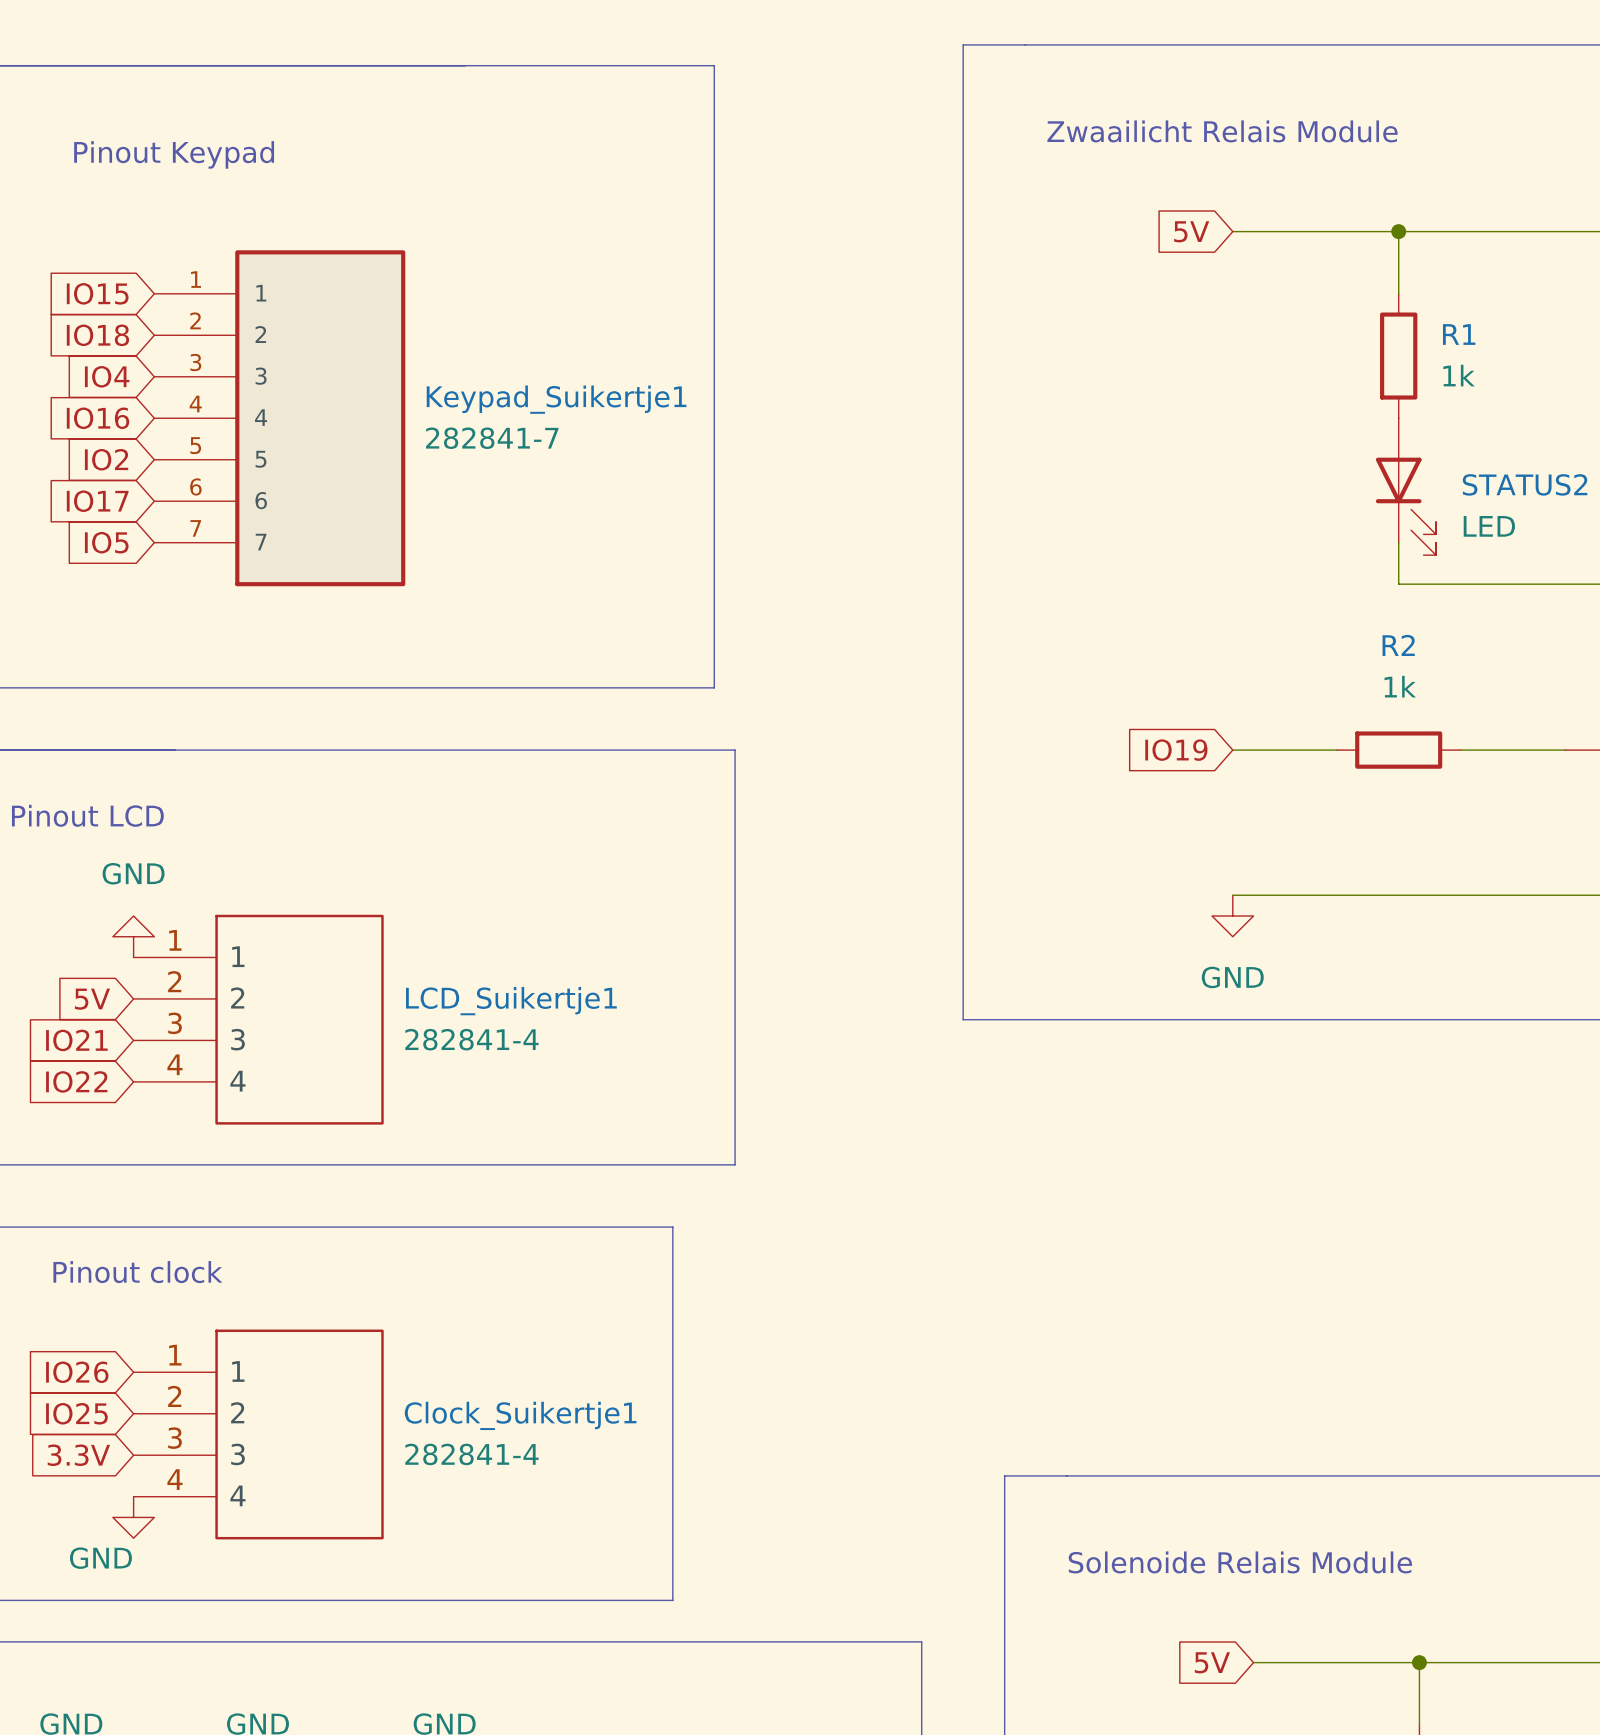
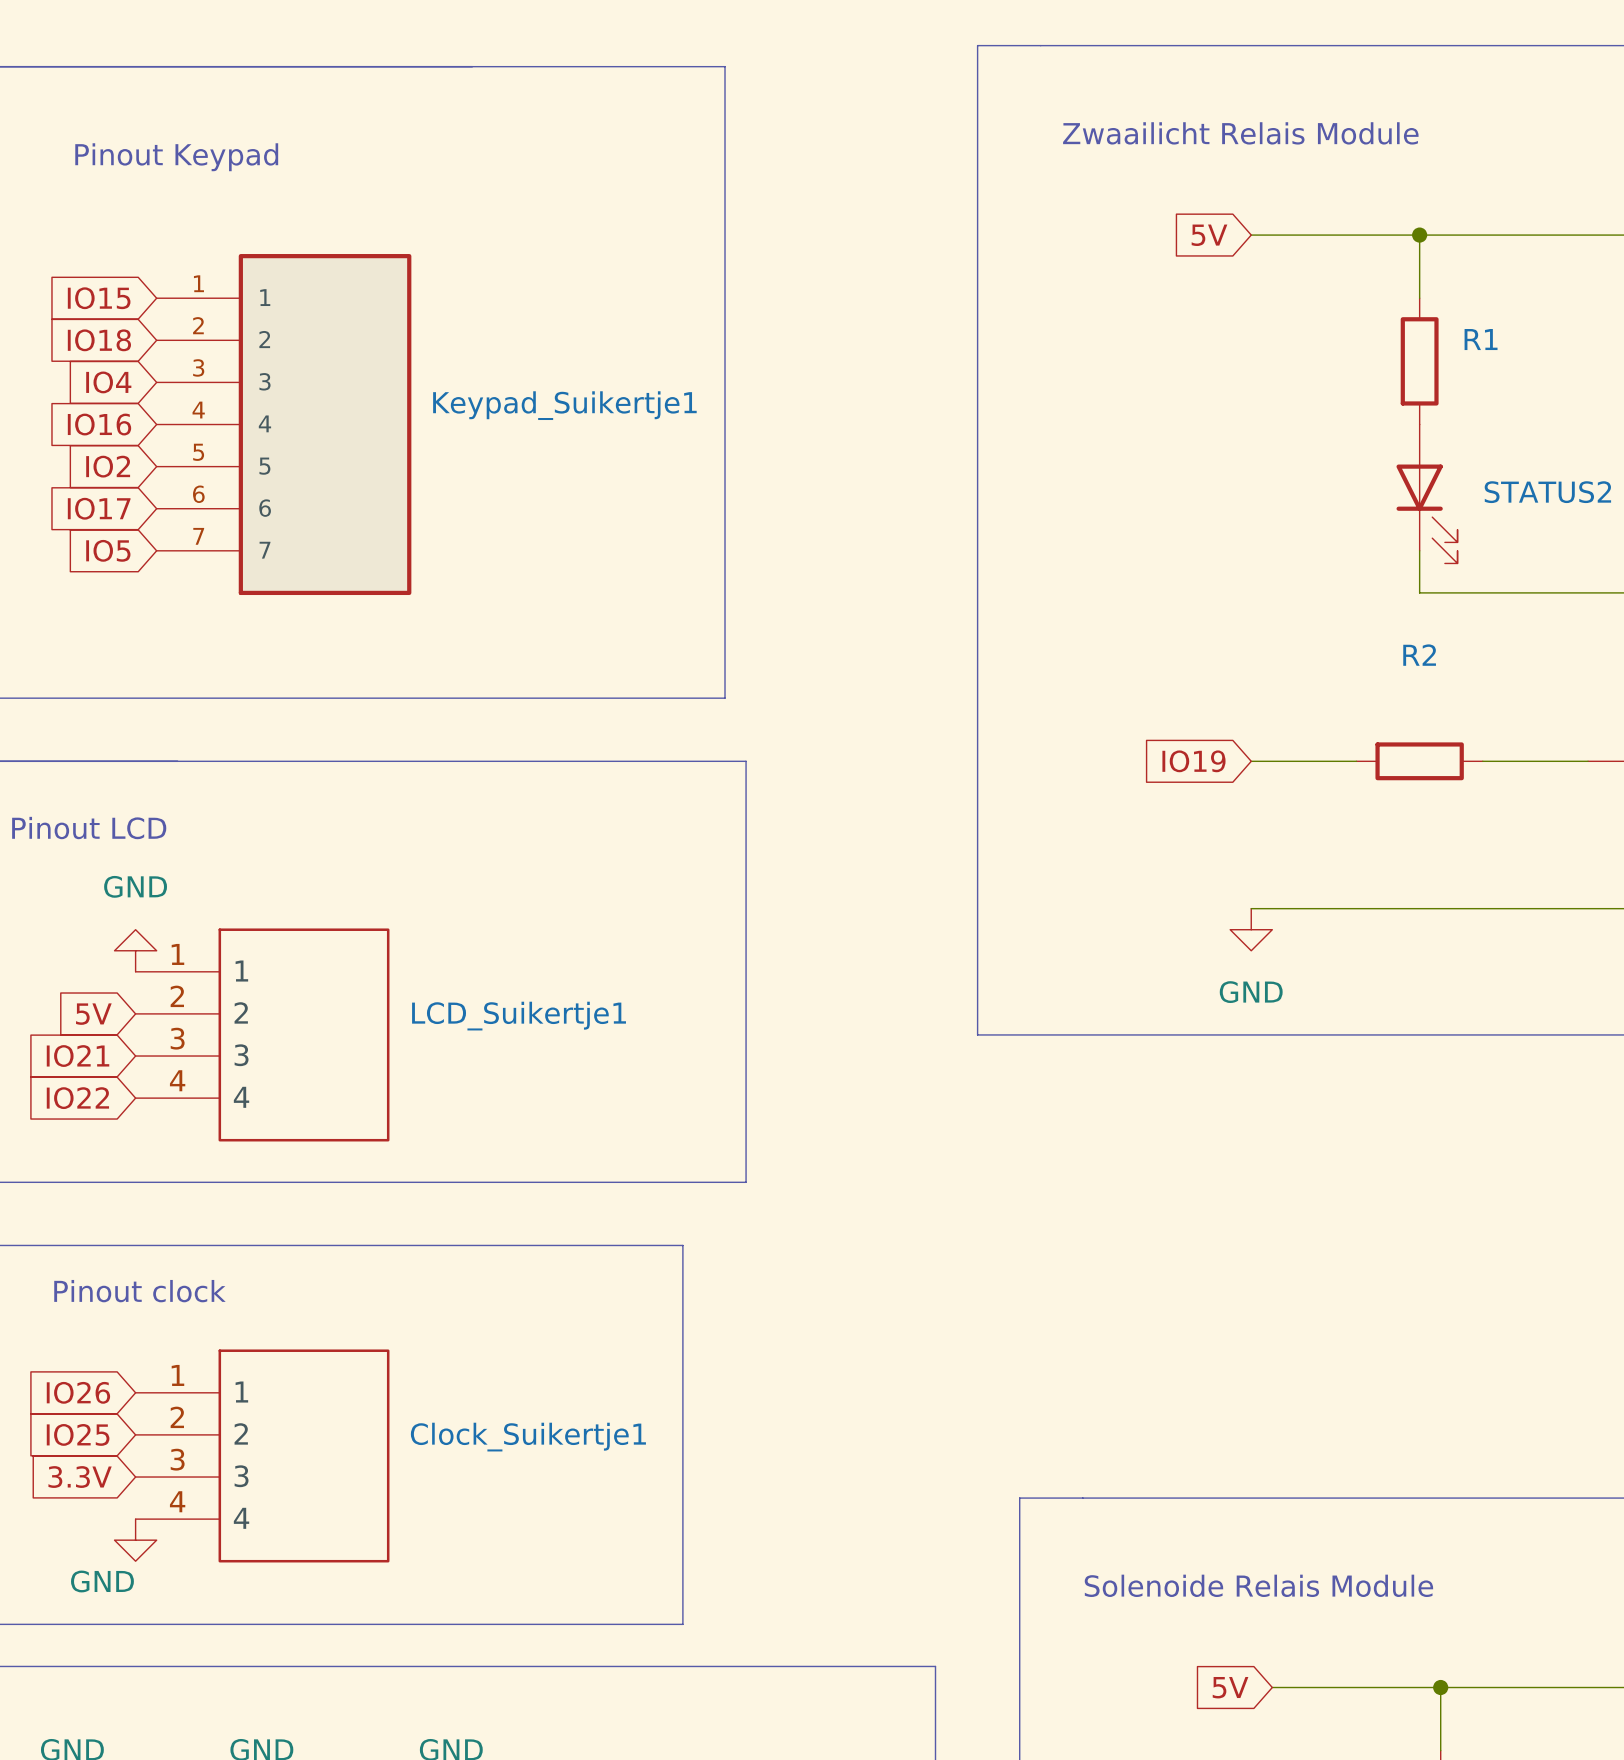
R1 value: 1k (1458, 375) -> none
Keypad_Suikertje1 value: 282841-7 (492, 438) -> none
STATUS2 value: LED (1489, 526) -> none
R2 value: 1k (1400, 686) -> none
LCD_Suikertje1 value: 282841-4 (471, 1039) -> none
Clock_Suikertje1 value: 282841-4 (471, 1454) -> none

